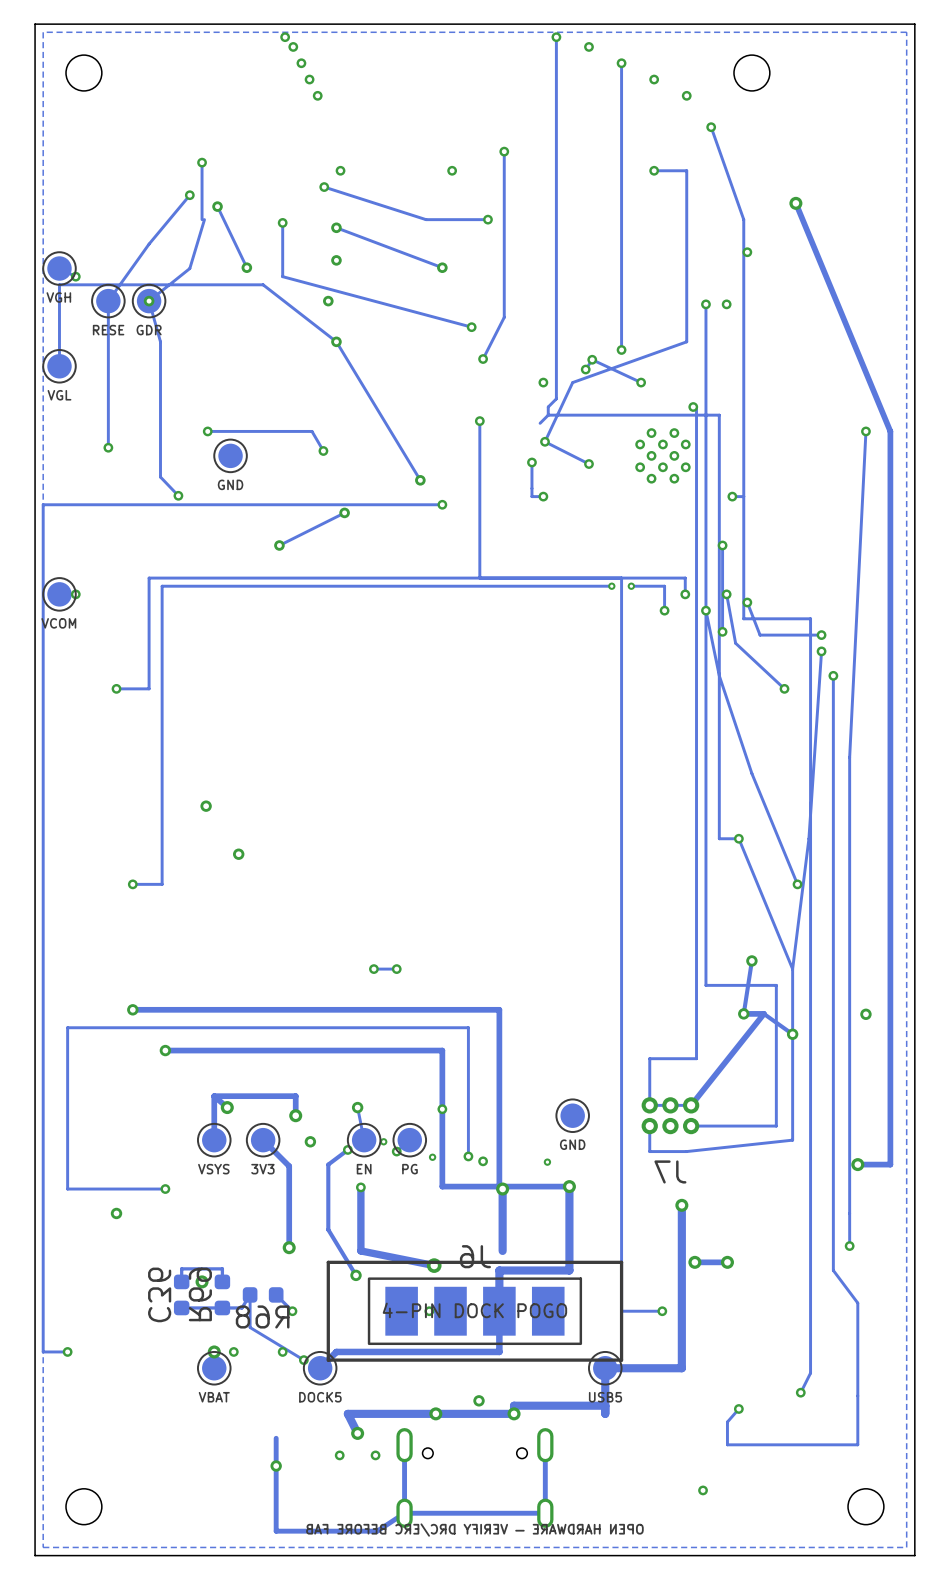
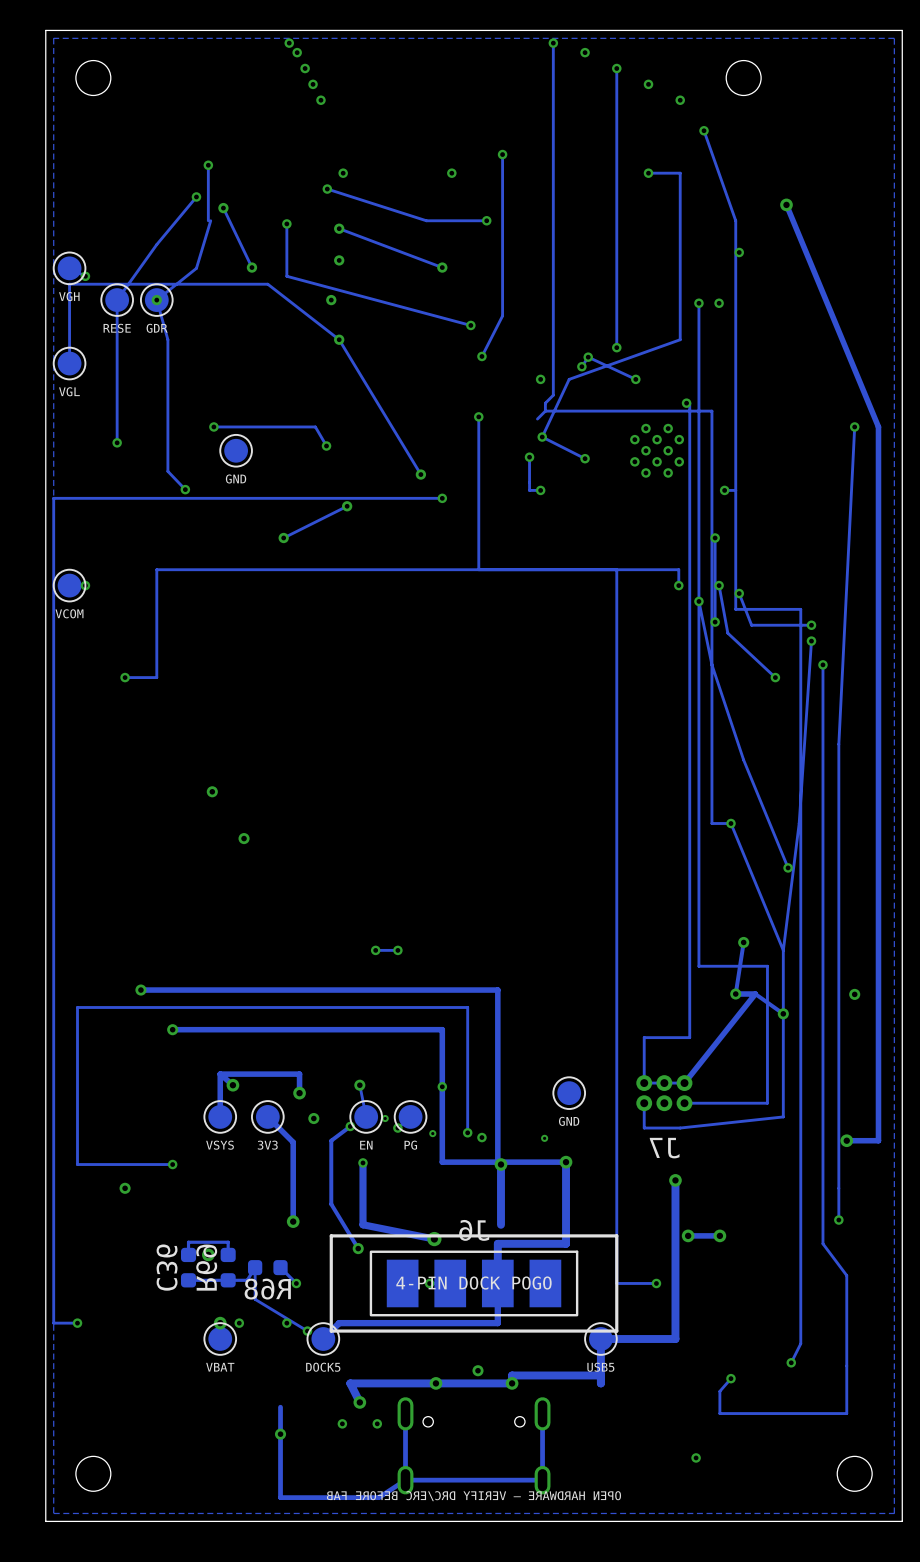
track: (611, 586) (162, 586) (162, 884) (132, 884) -> none
via: (611, 586) -> none
track: (631, 586) (664, 586) (664, 610) -> none
via: (631, 586) -> none
via: (664, 610) -> none
via: (132, 884) -> none

